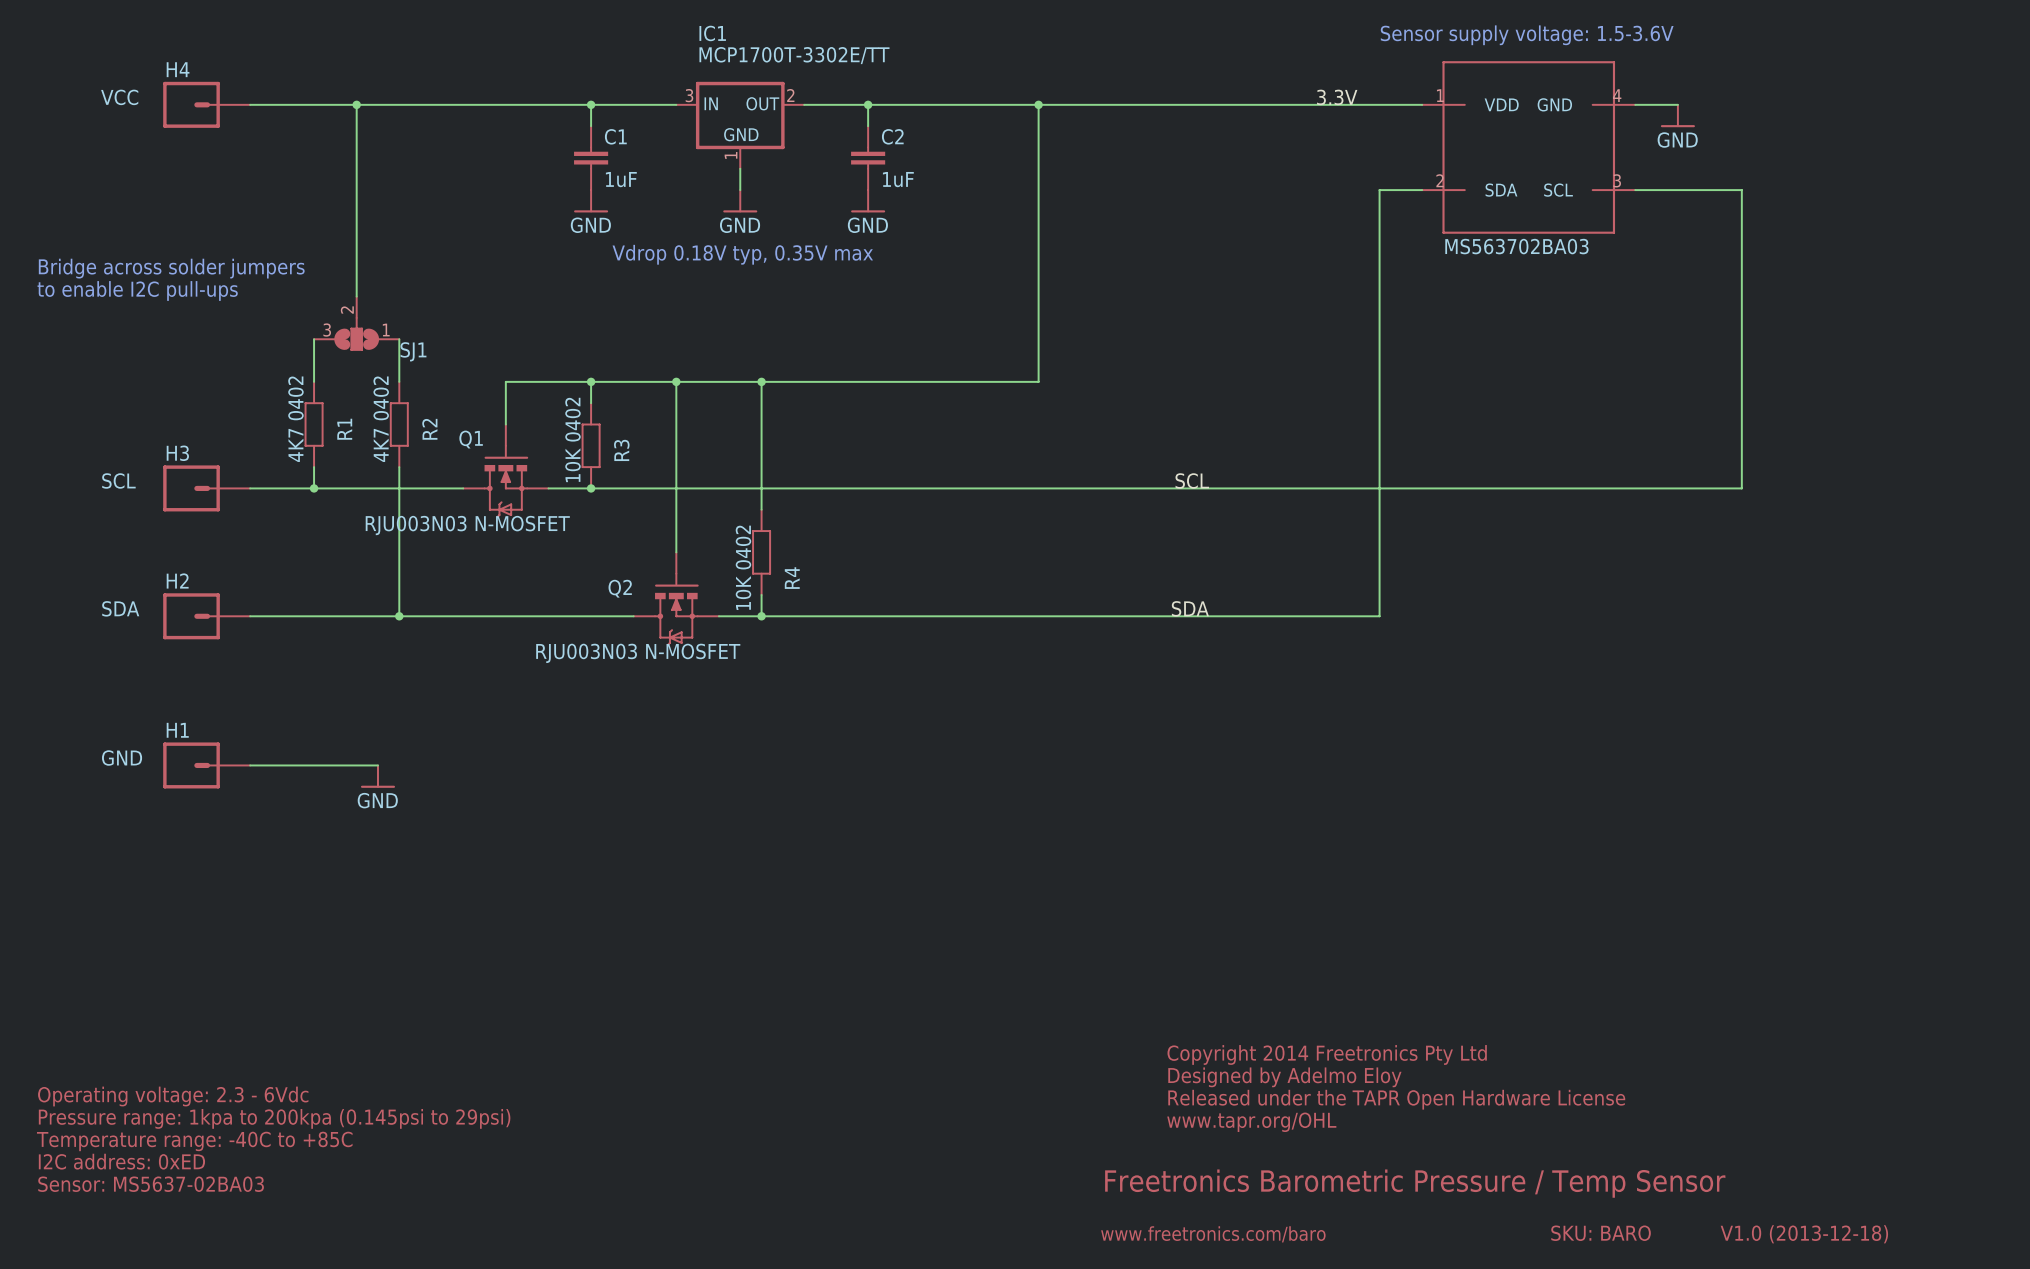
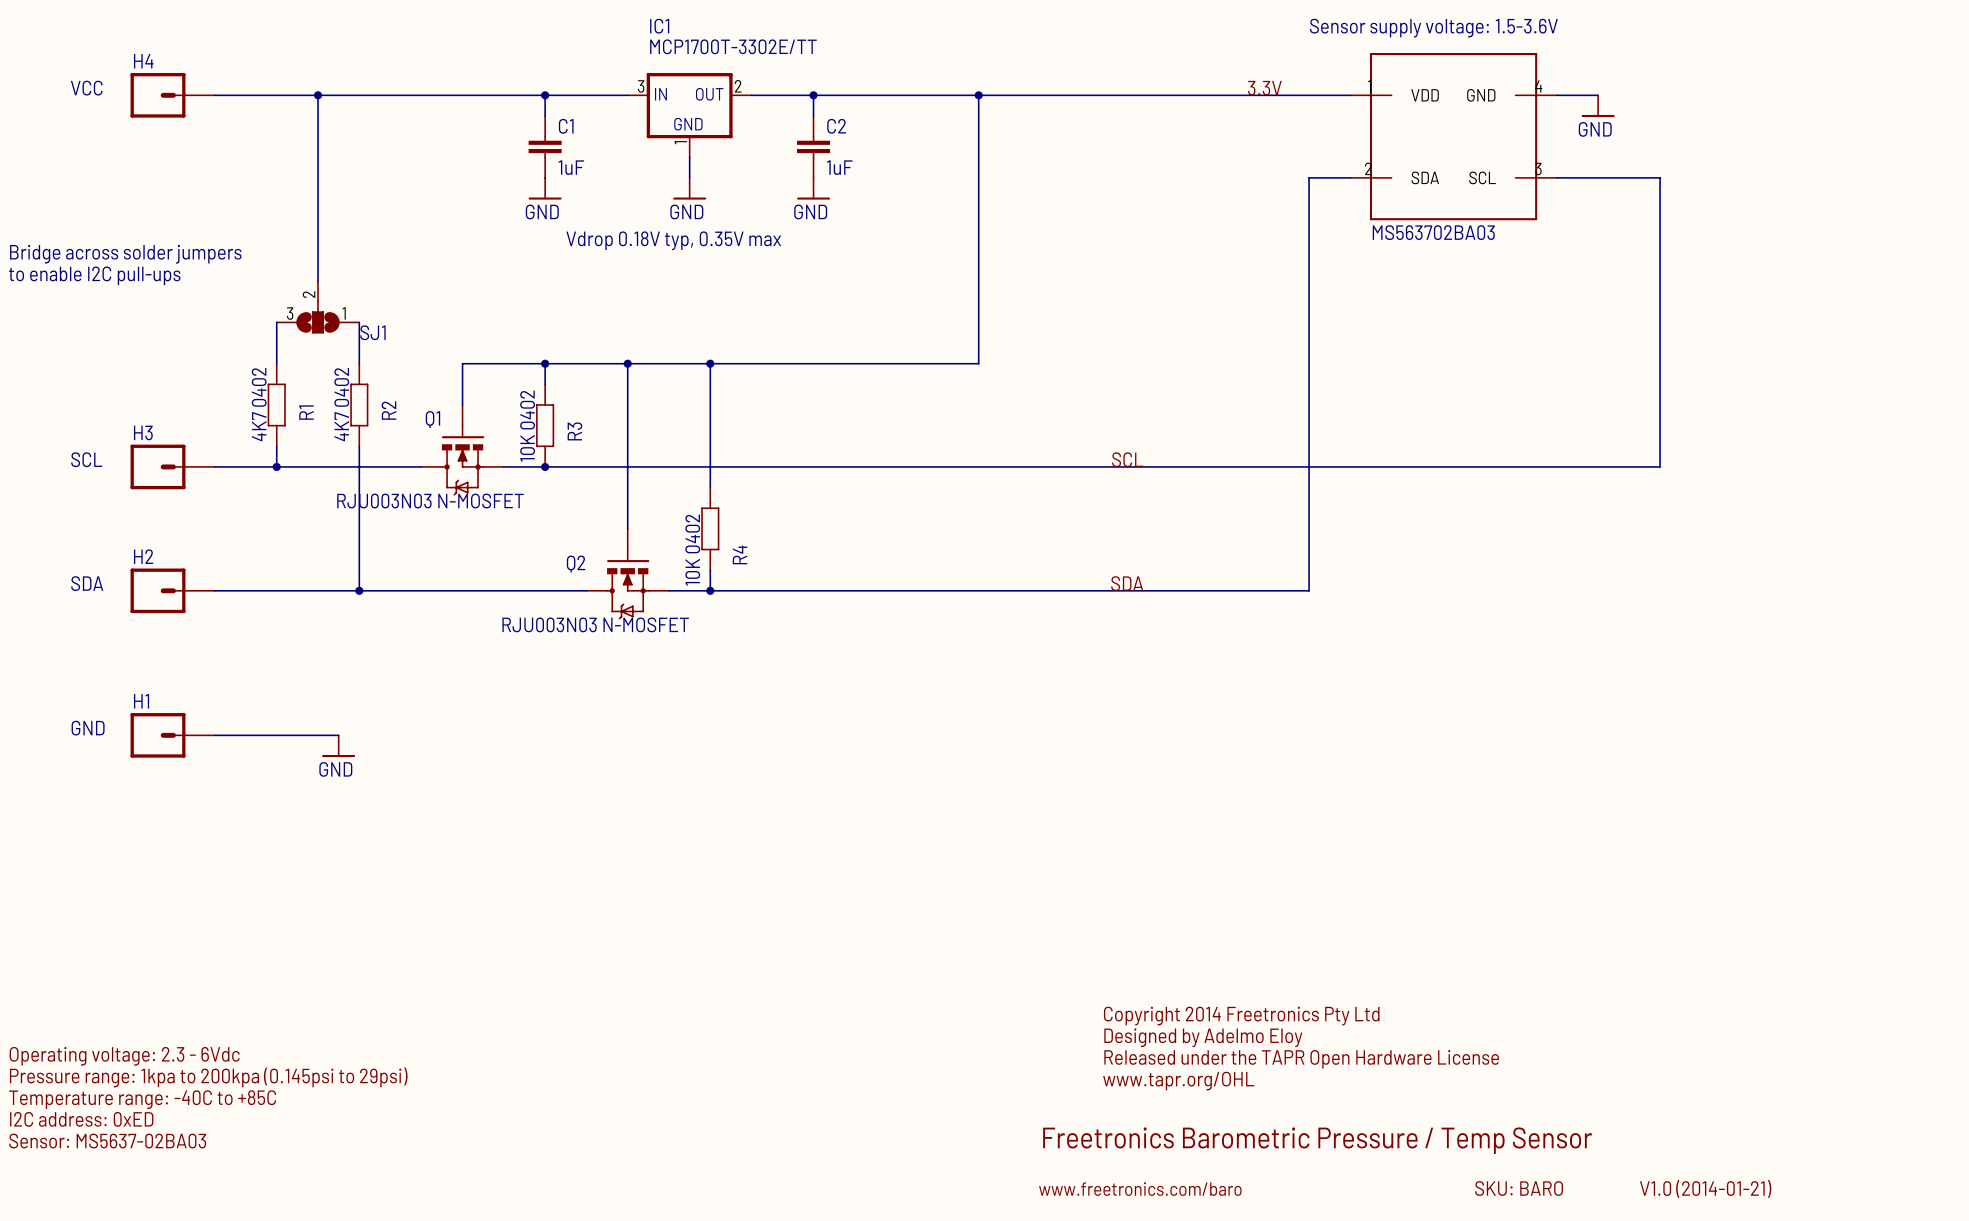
text: V1.0 (2013-12-18) (1804, 1234) -> V1.0 (2014-01-21) (1705, 1188)

